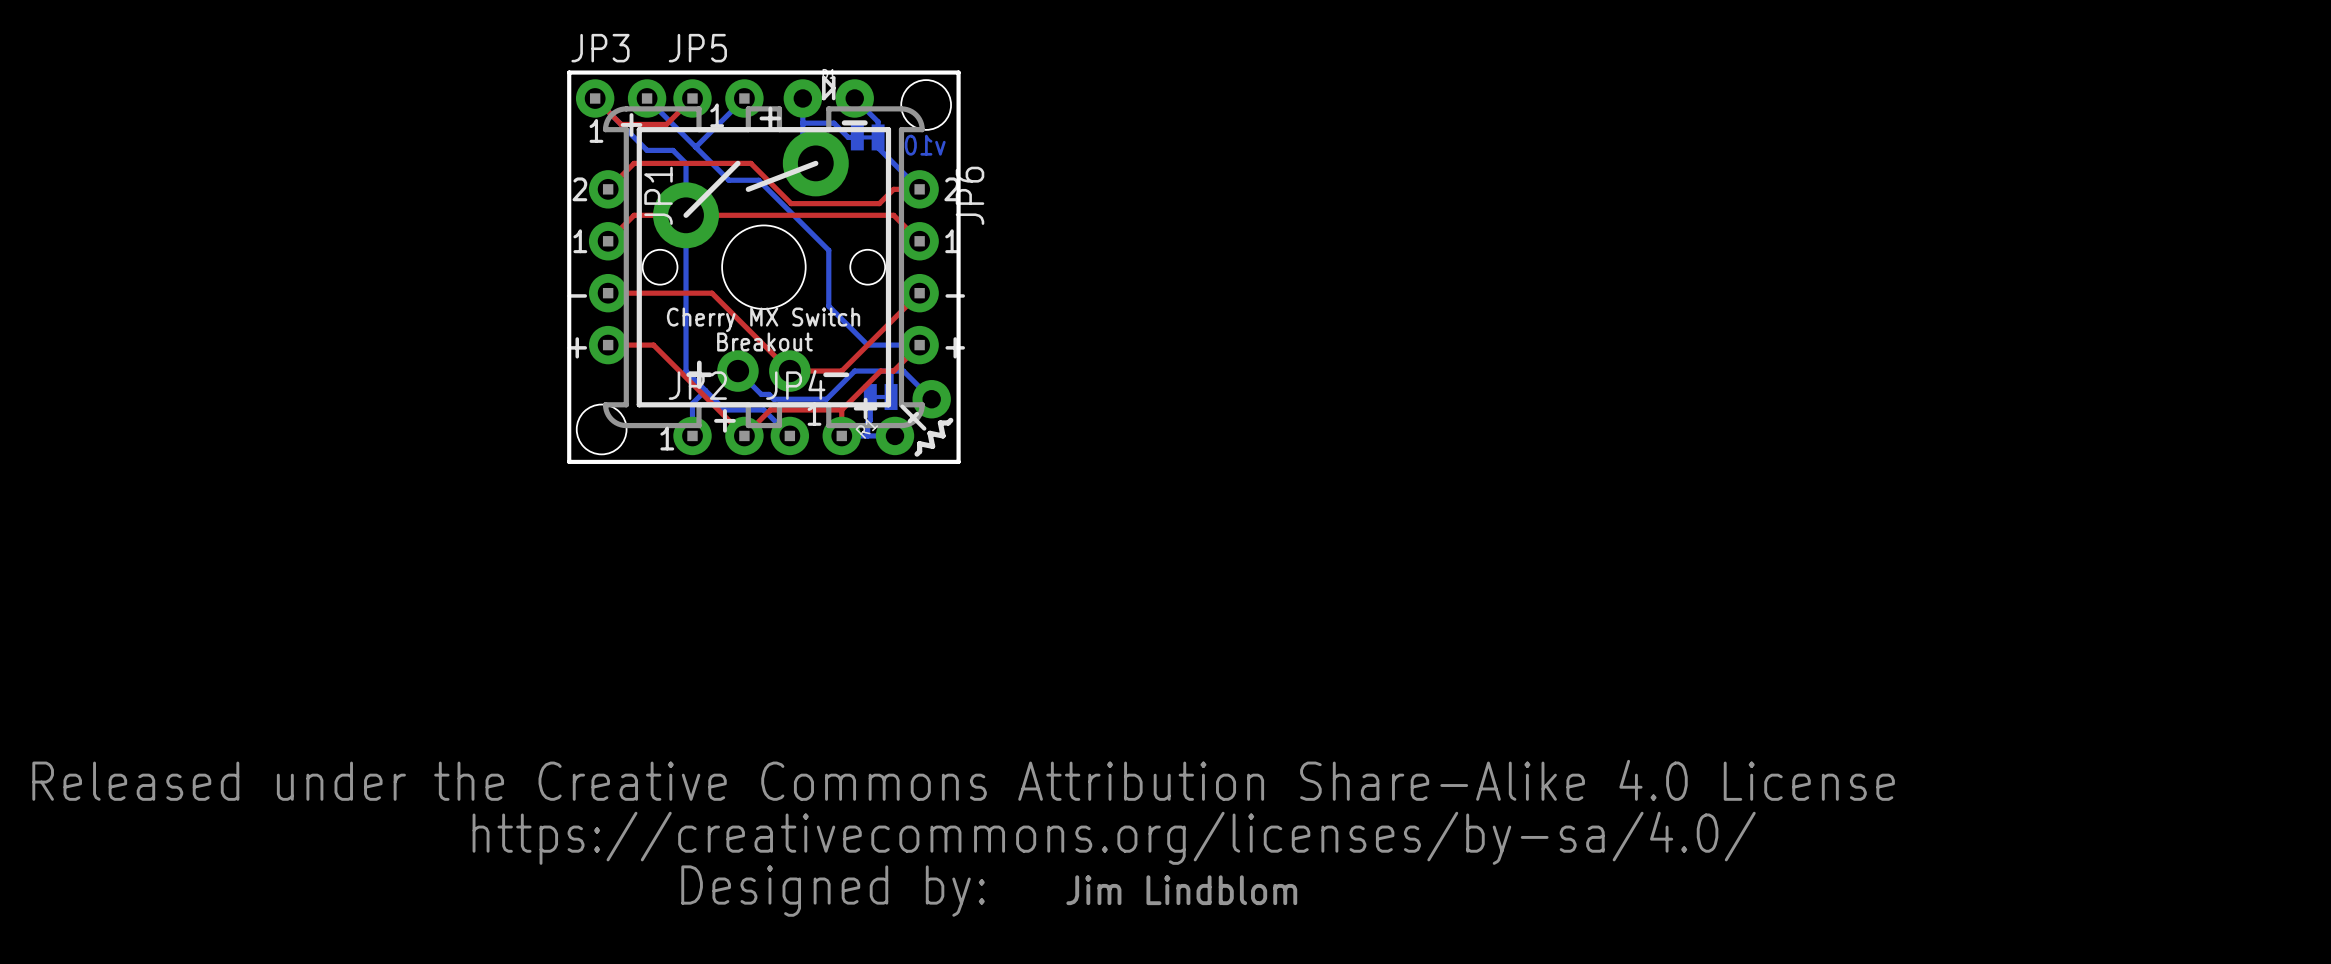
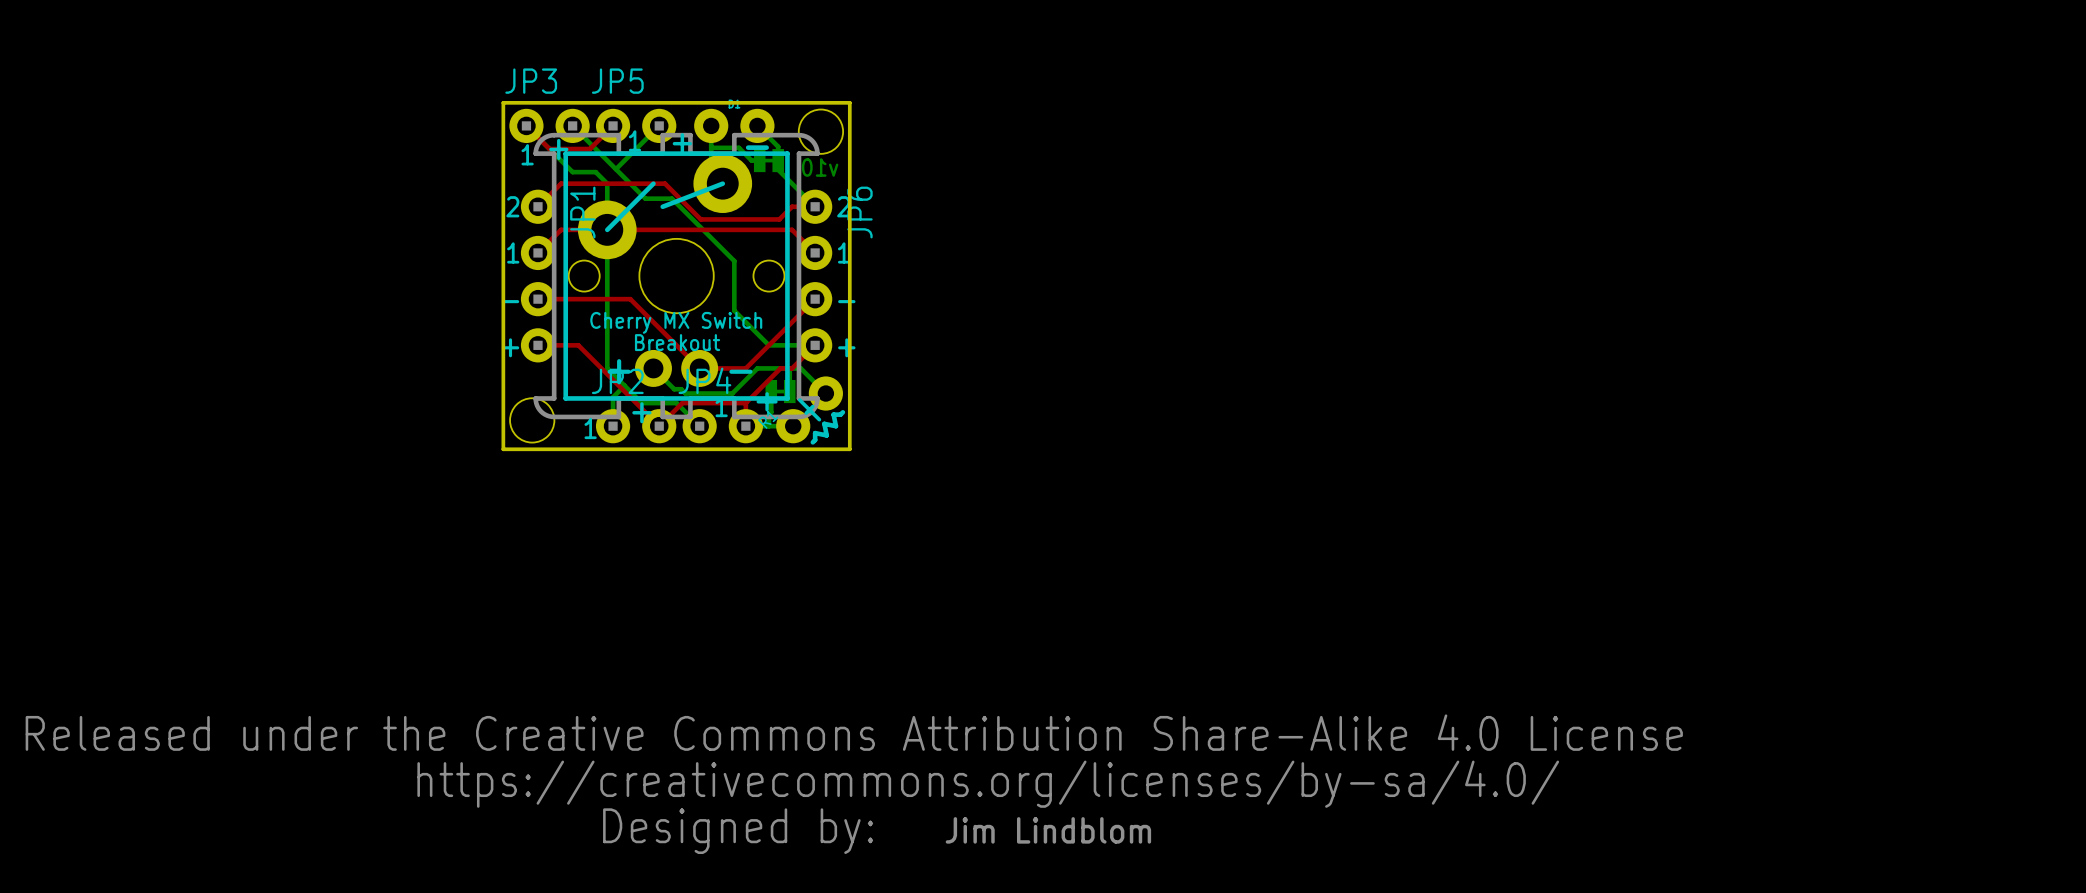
line: (823, 77) (823, 98) (833, 88) (823, 77) -> none
line: (833, 77) (833, 98) -> none

